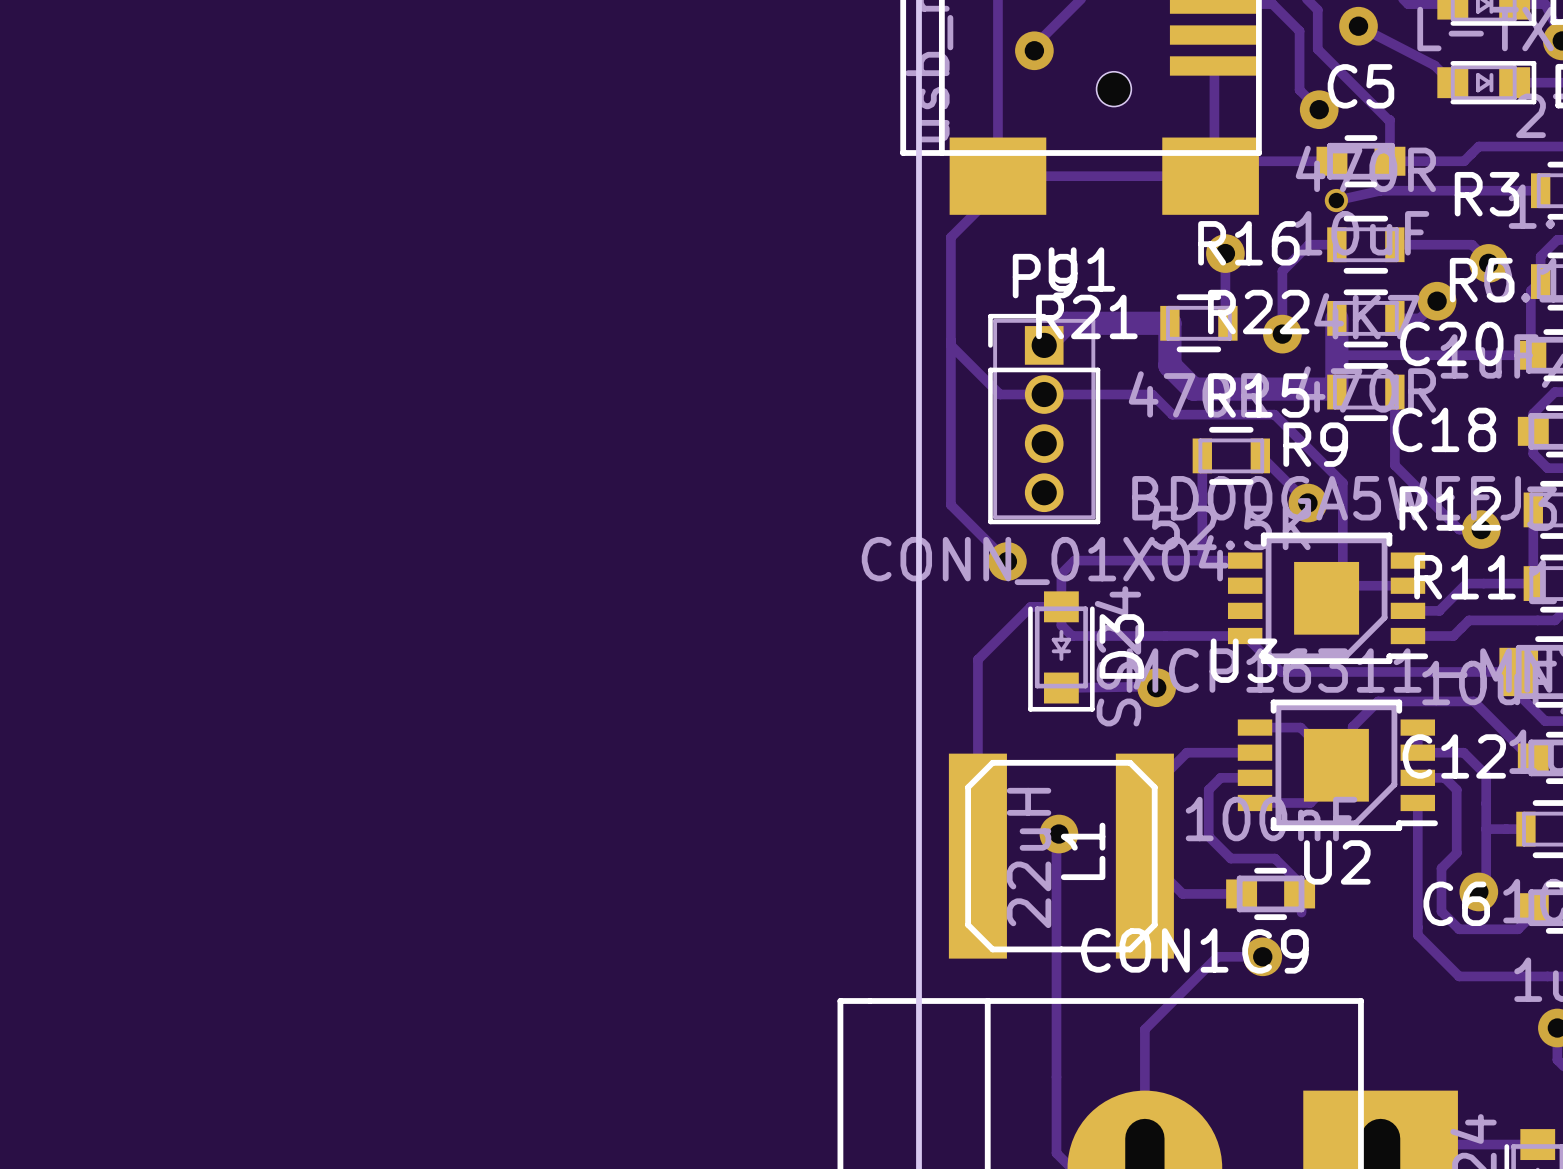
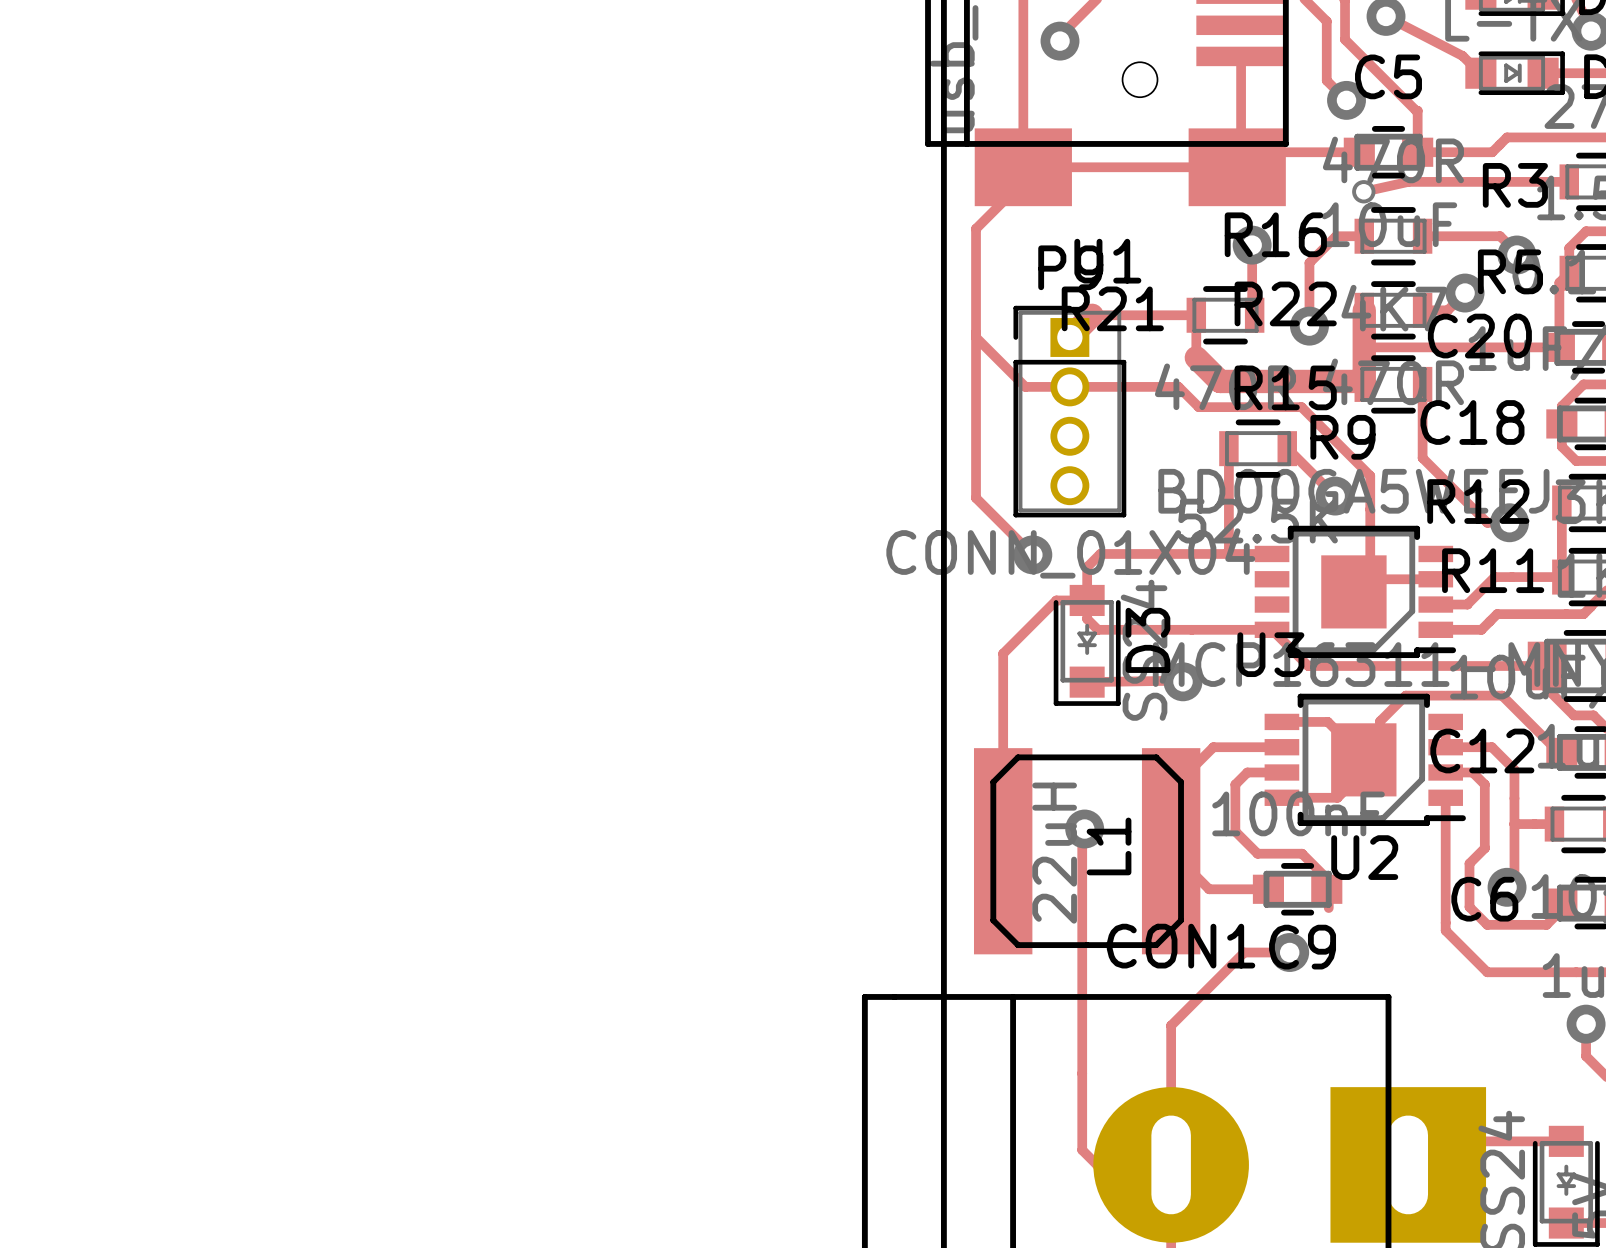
track width: thick (1066, 323) (1169, 323) (1169, 365) -> thin (1092, 315) (1196, 315) (1196, 357)

